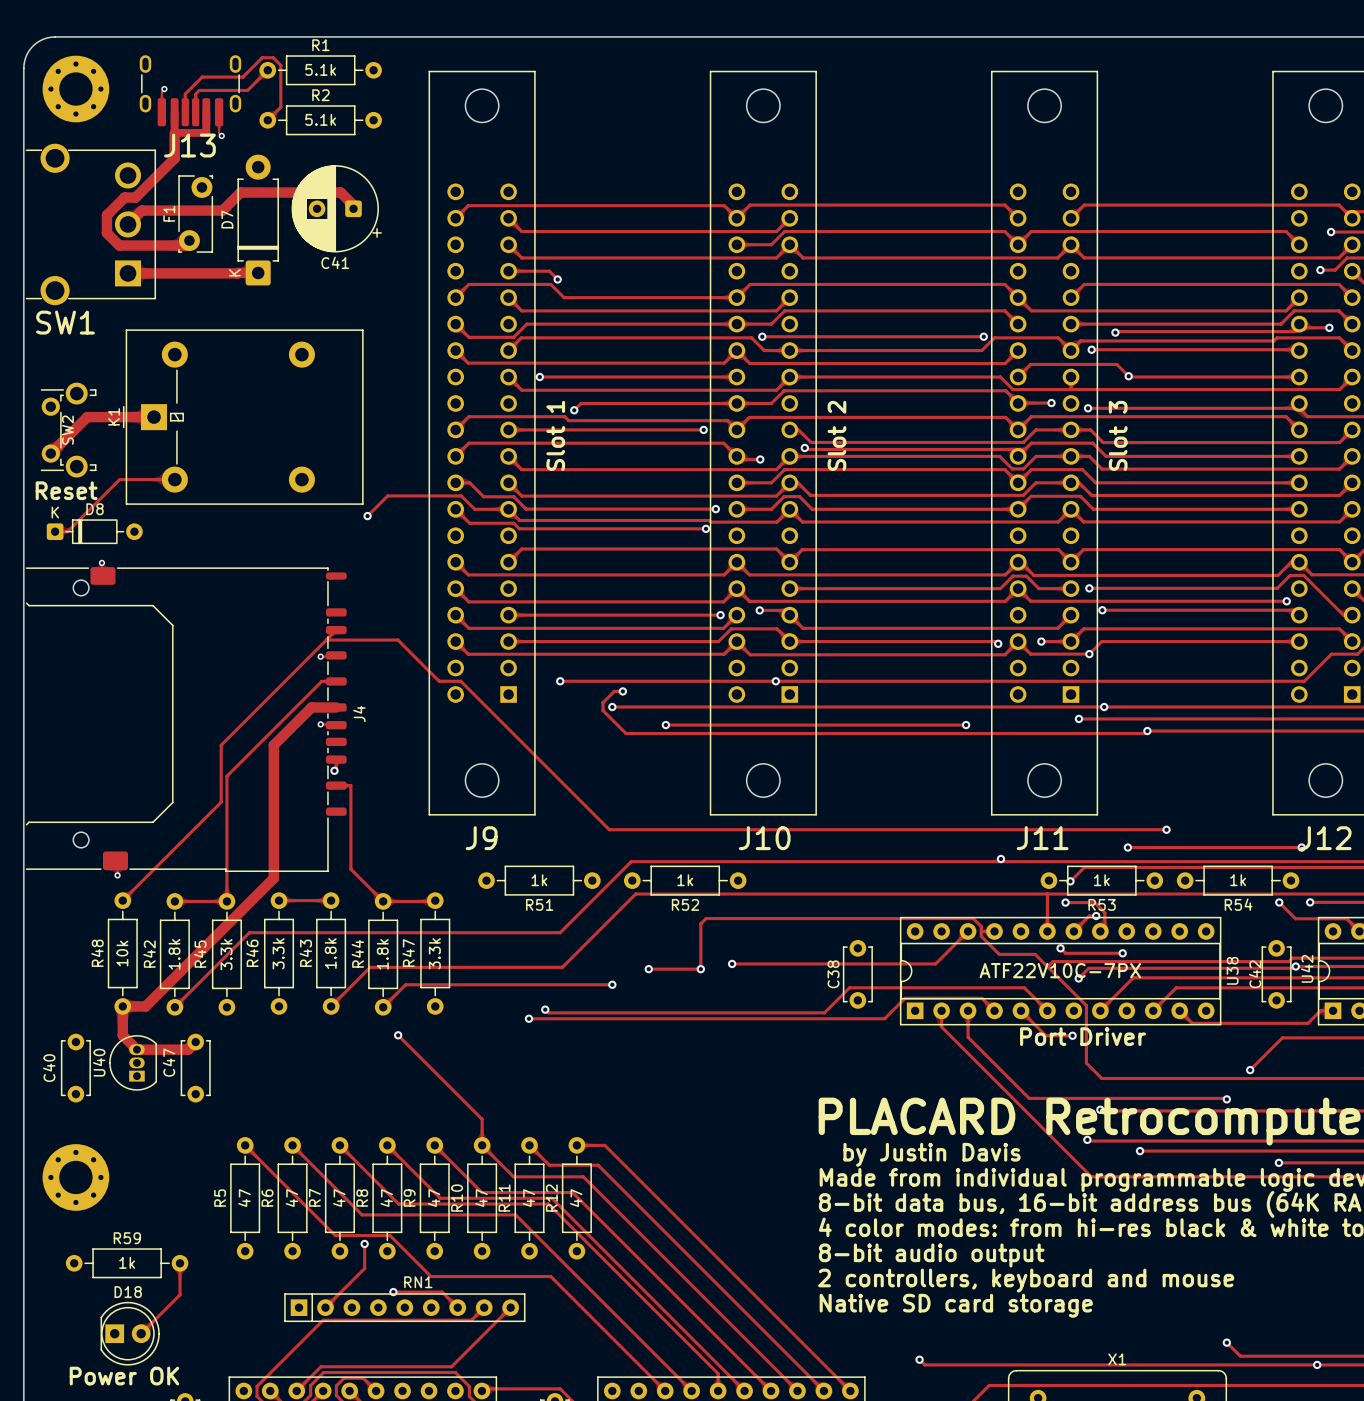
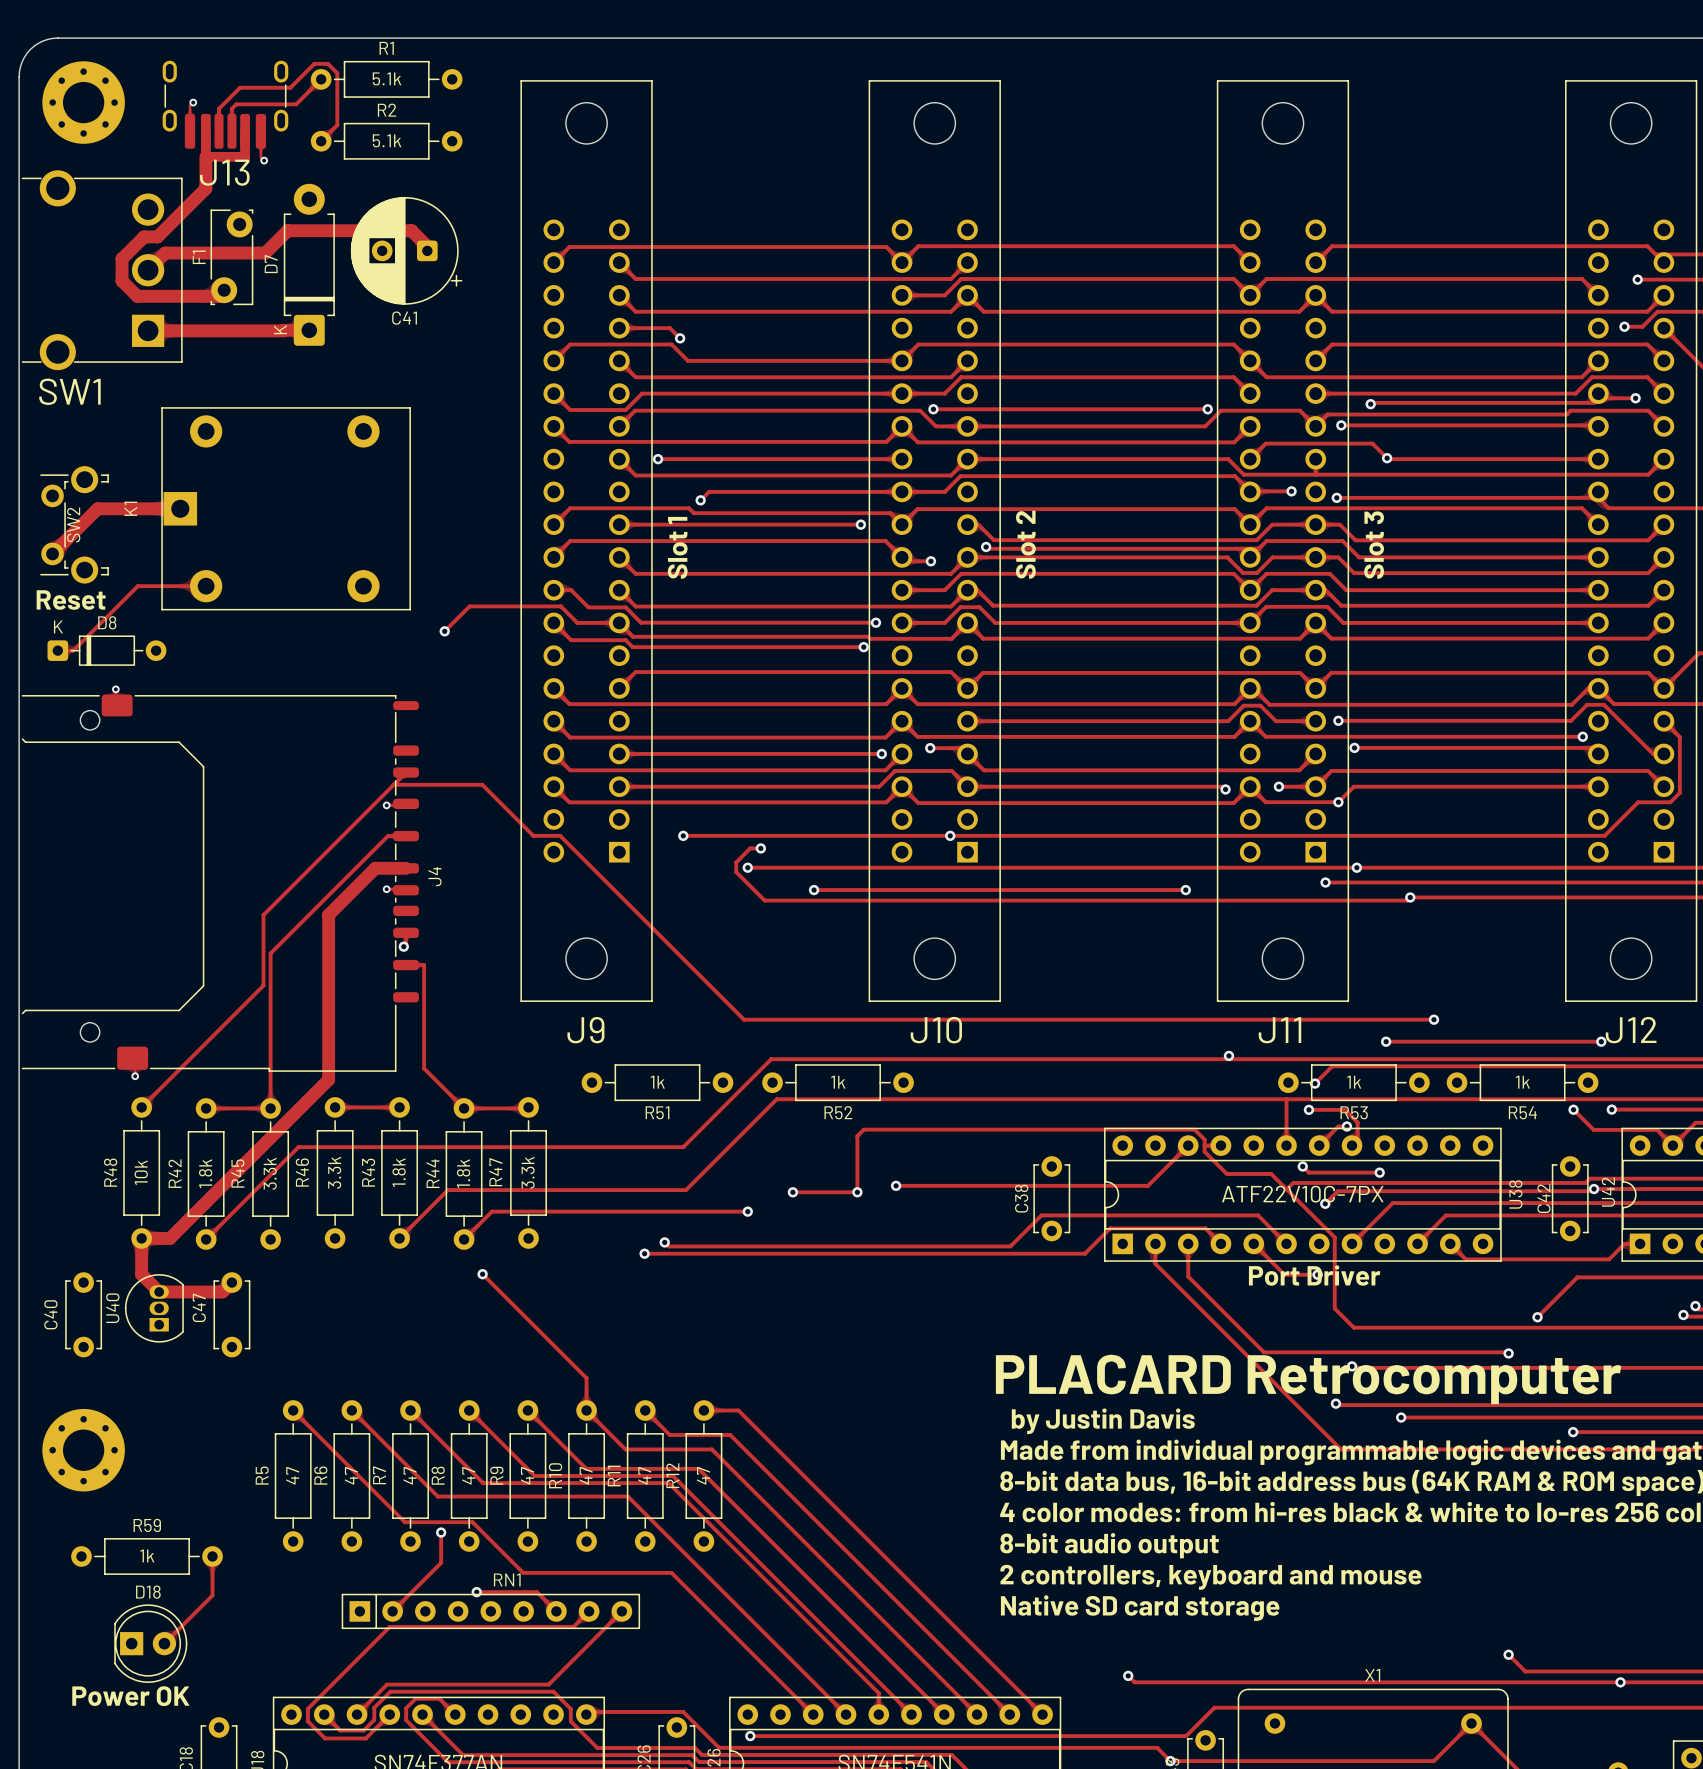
K1 footprint: [123, 329, 364, 505] -> [161, 407, 411, 611]

